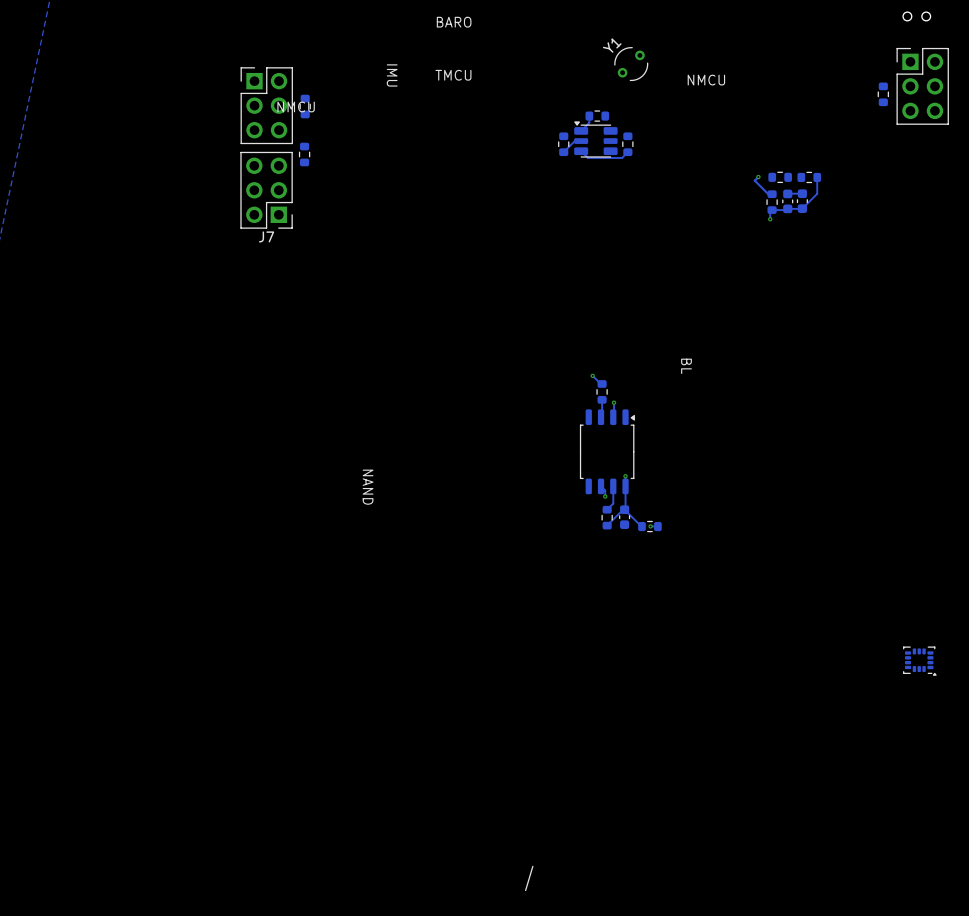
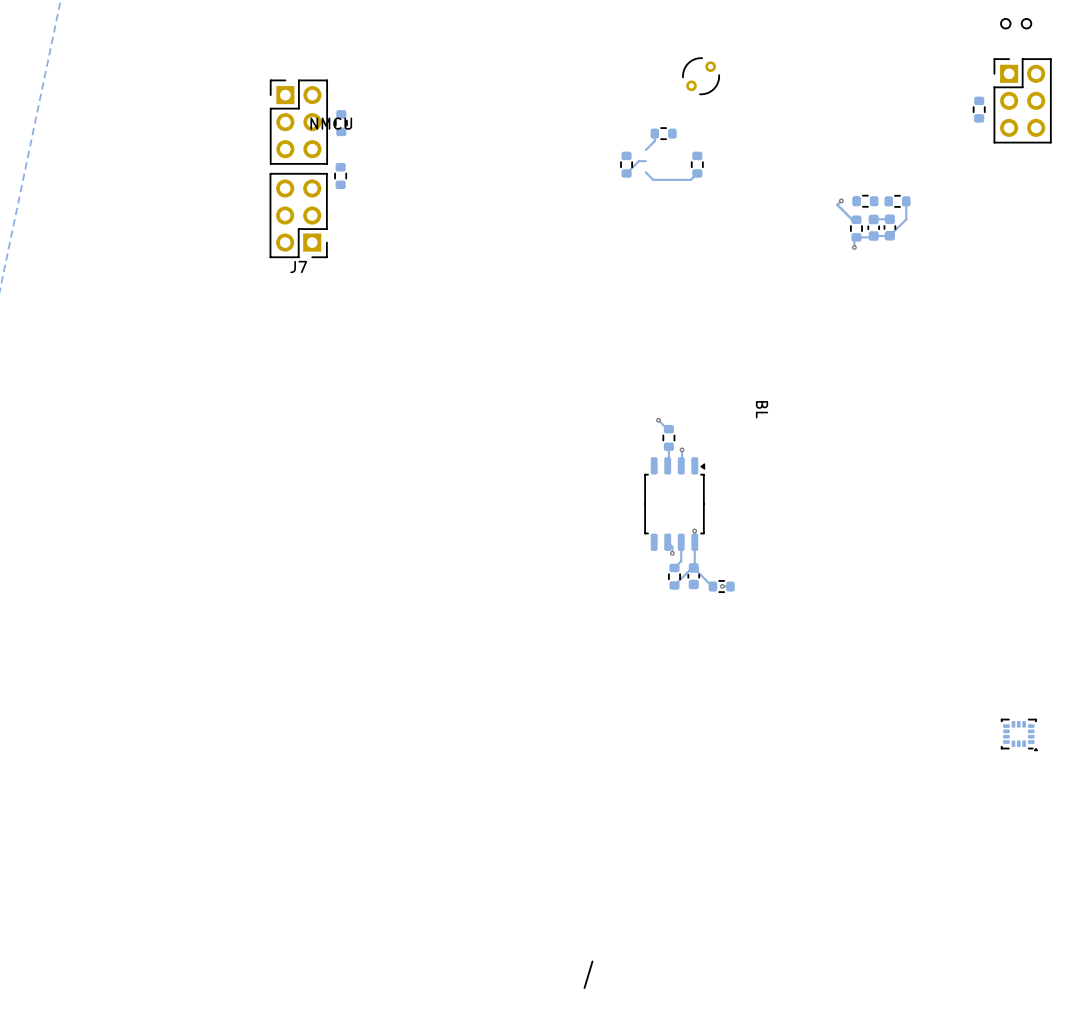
text: BARO (454, 22) -> none
Y1 name: Y1 (612, 45) -> none
text: IMU (392, 75) -> none
text: TMCU (453, 75) -> none
text: NMCU (706, 80) -> none
part: (595, 139) -> none
text: NAND (368, 487) -> none

